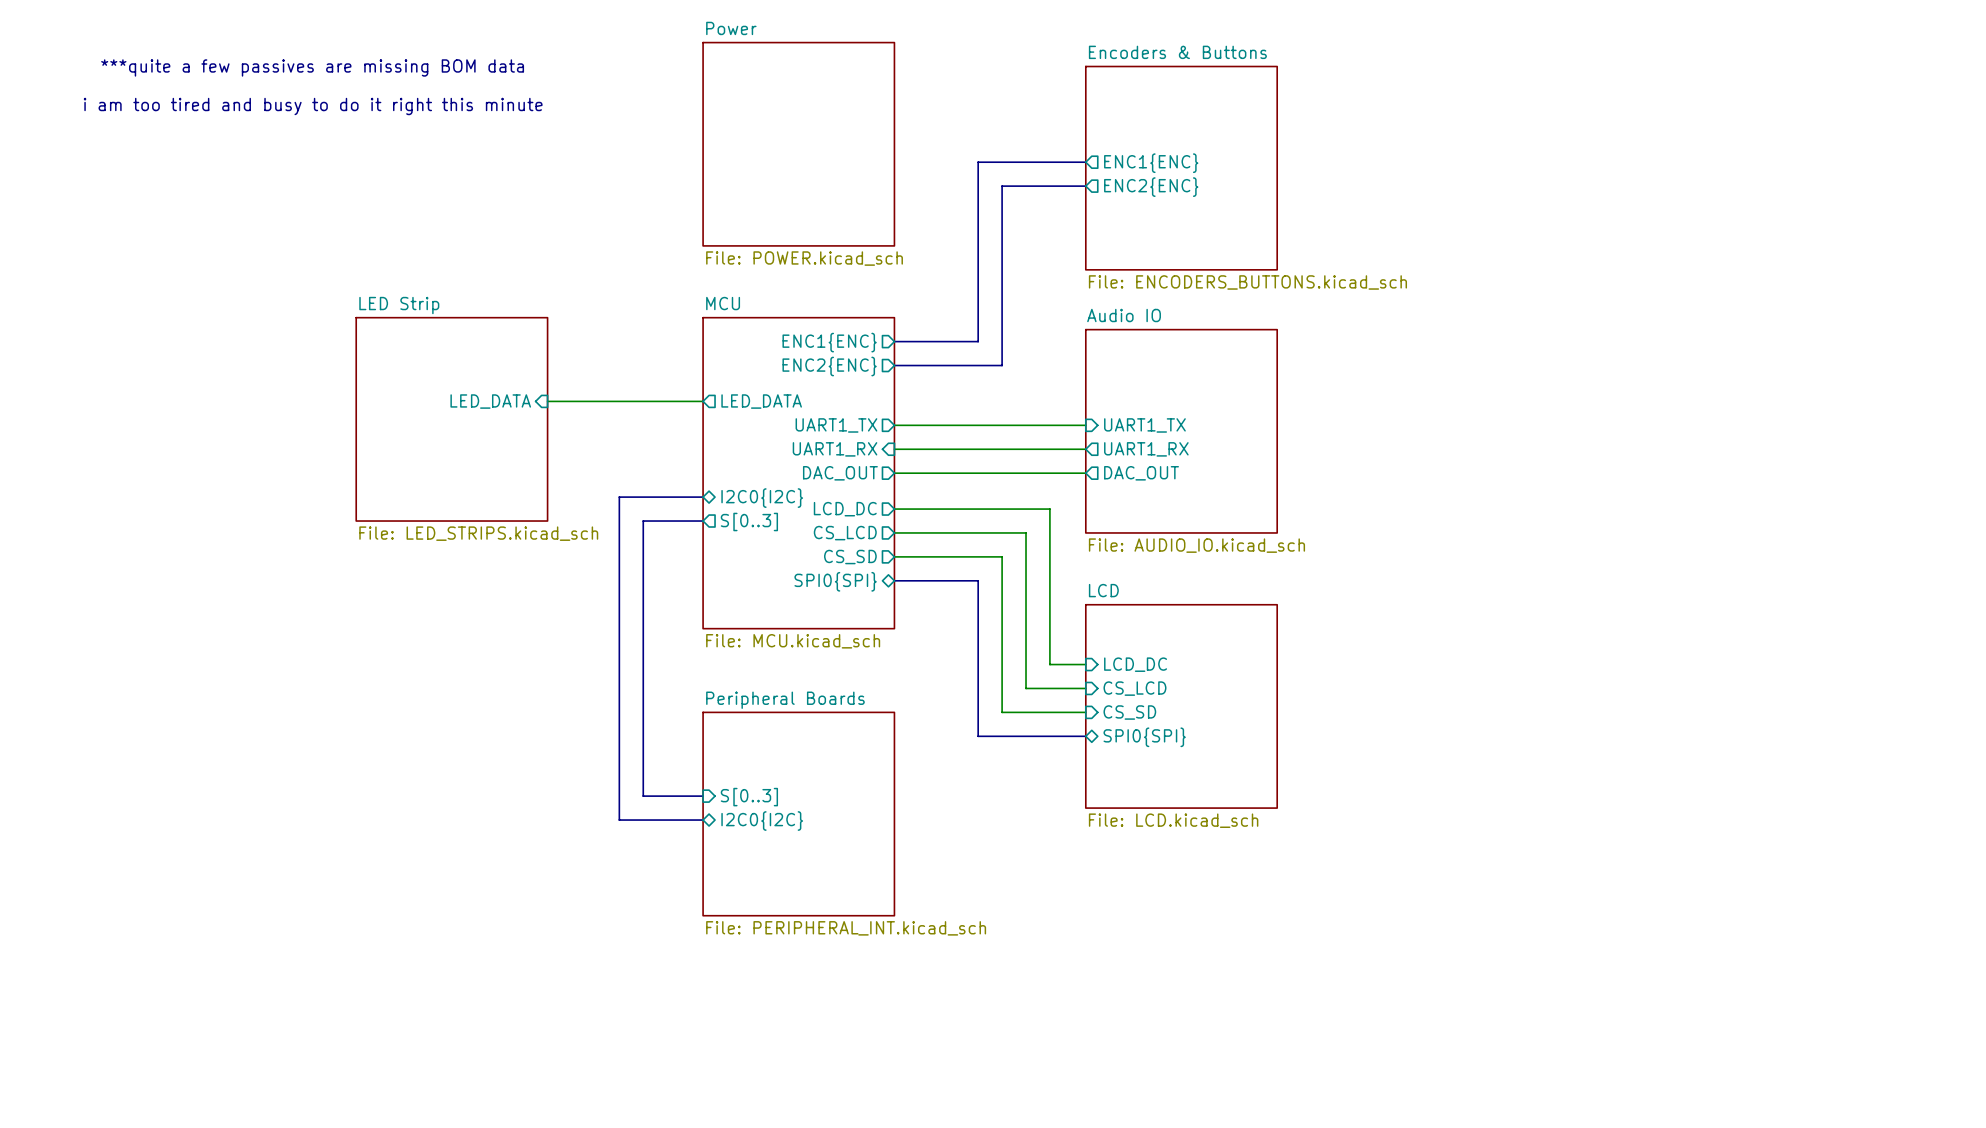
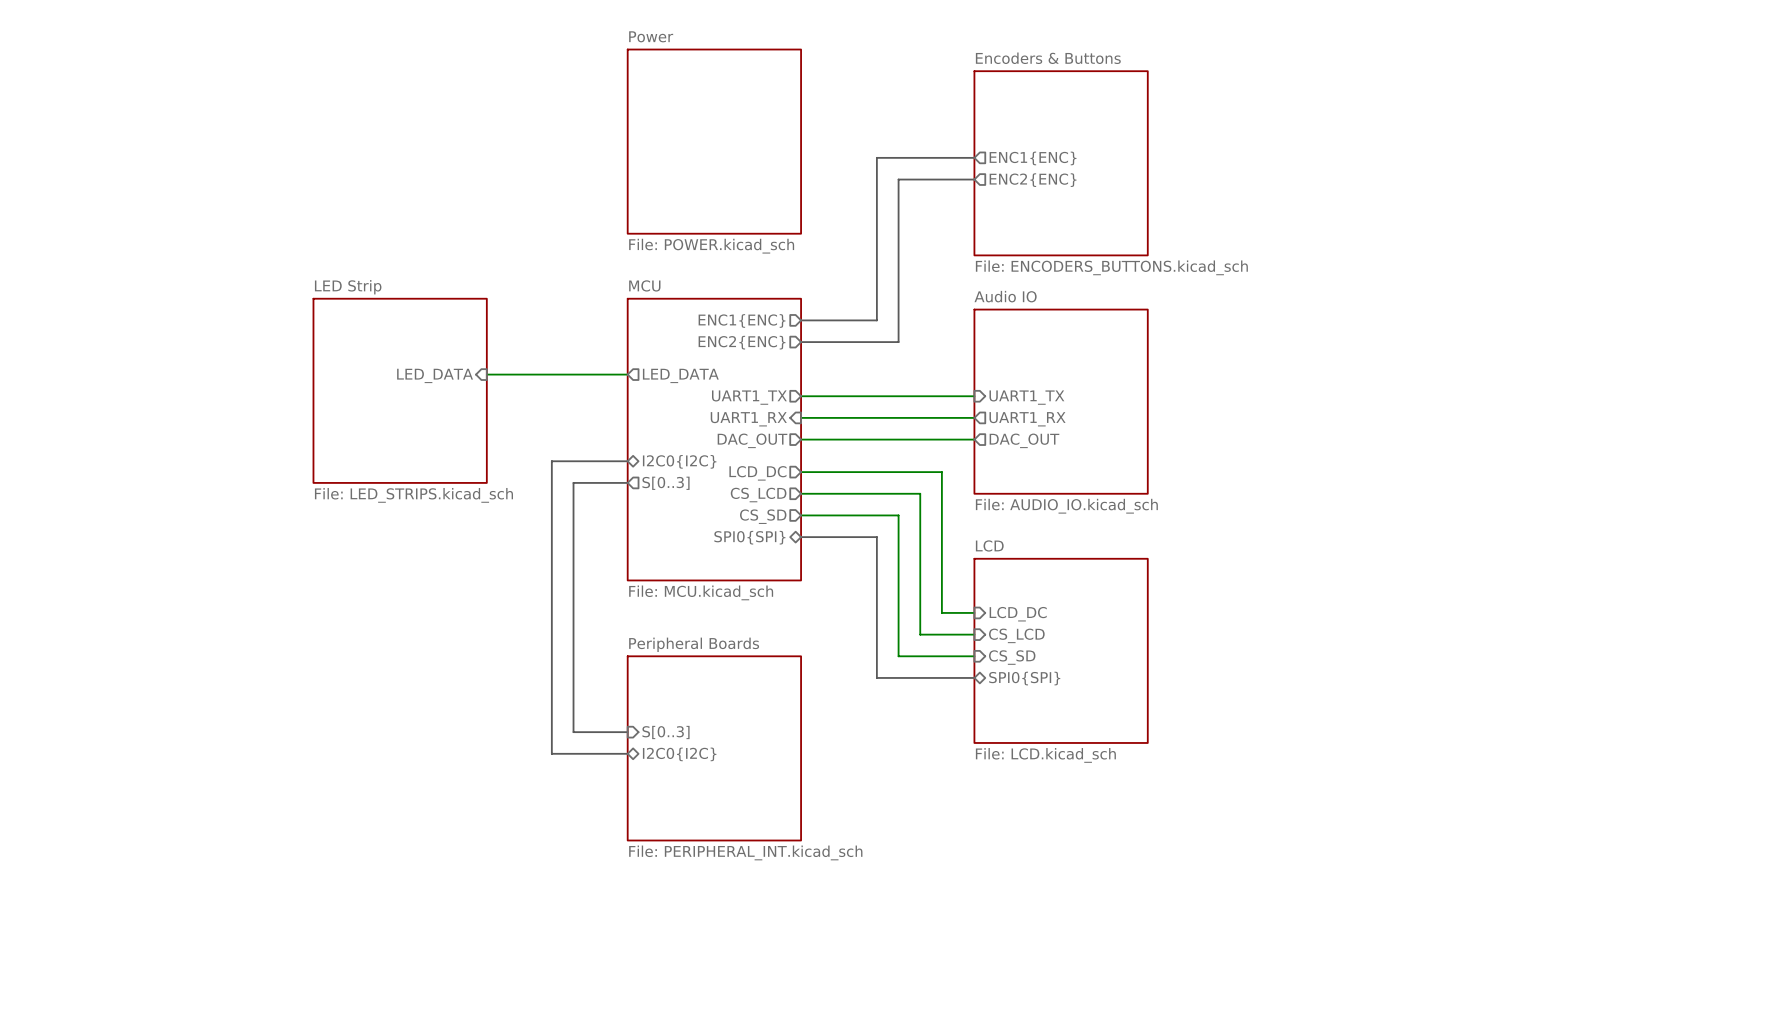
text: ***quite a few passives are missing BOM data (312, 67) -> none
text: i am too tired and busy to do it right this minute (313, 106) -> none

